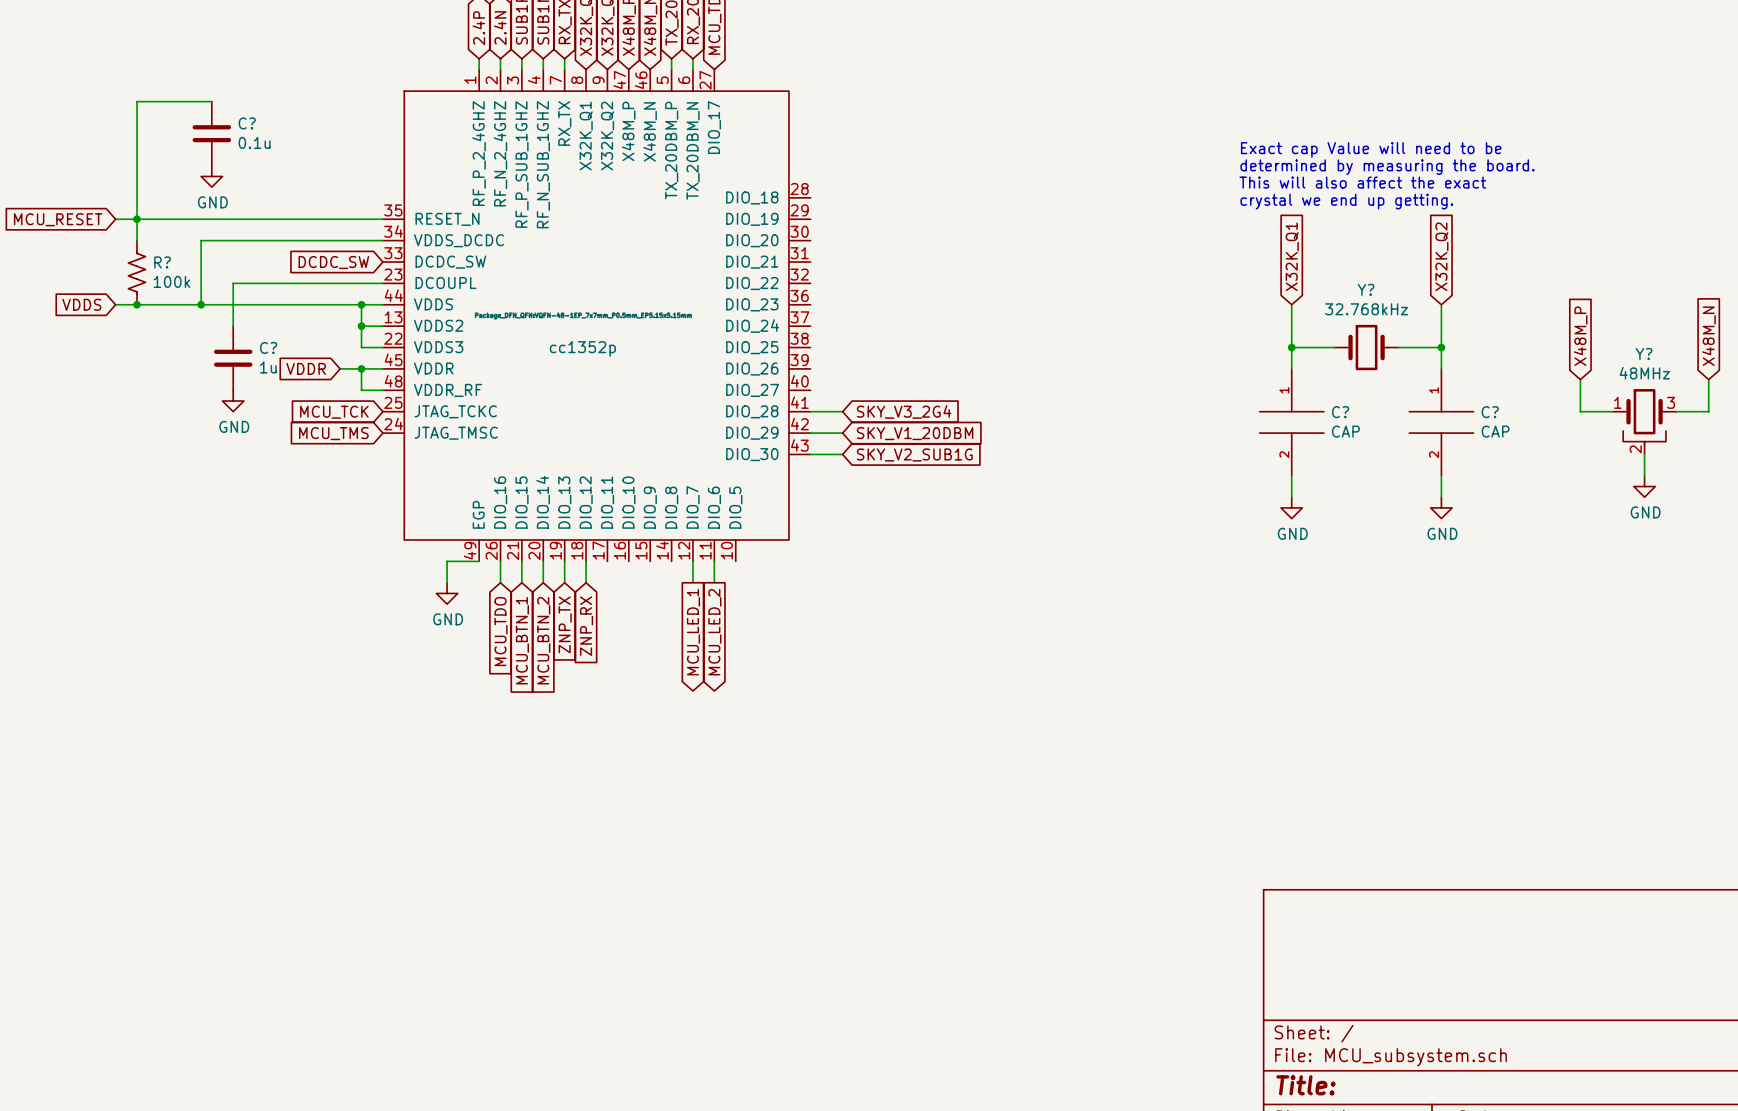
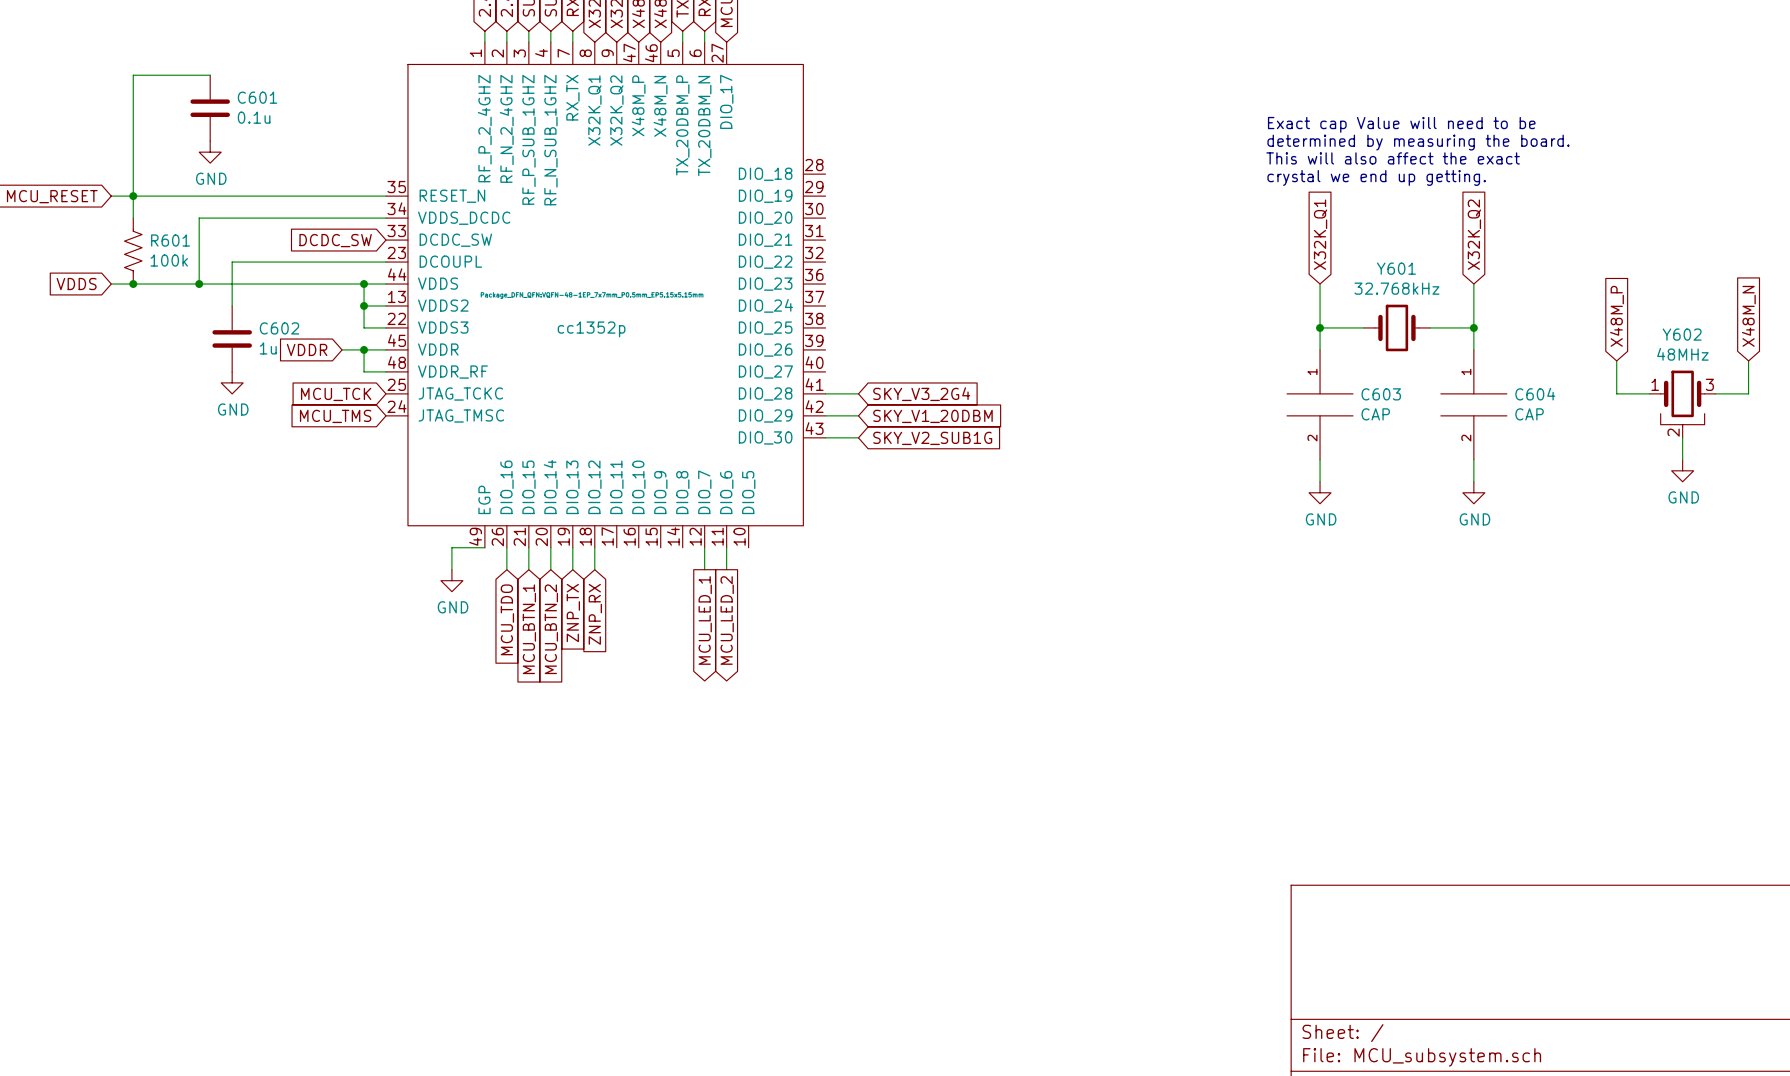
C? name: C? (247, 123) -> C601 (257, 97)
R? name: R? (162, 262) -> R601 (170, 240)
Y? name: Y? (1366, 289) -> Y601 (1396, 268)
C? name: C? (268, 348) -> C602 (279, 328)
Y? name: Y? (1644, 353) -> Y602 (1682, 334)
C? name: C? (1340, 412) -> C603 (1381, 394)
C? name: C? (1490, 412) -> C604 (1535, 394)

